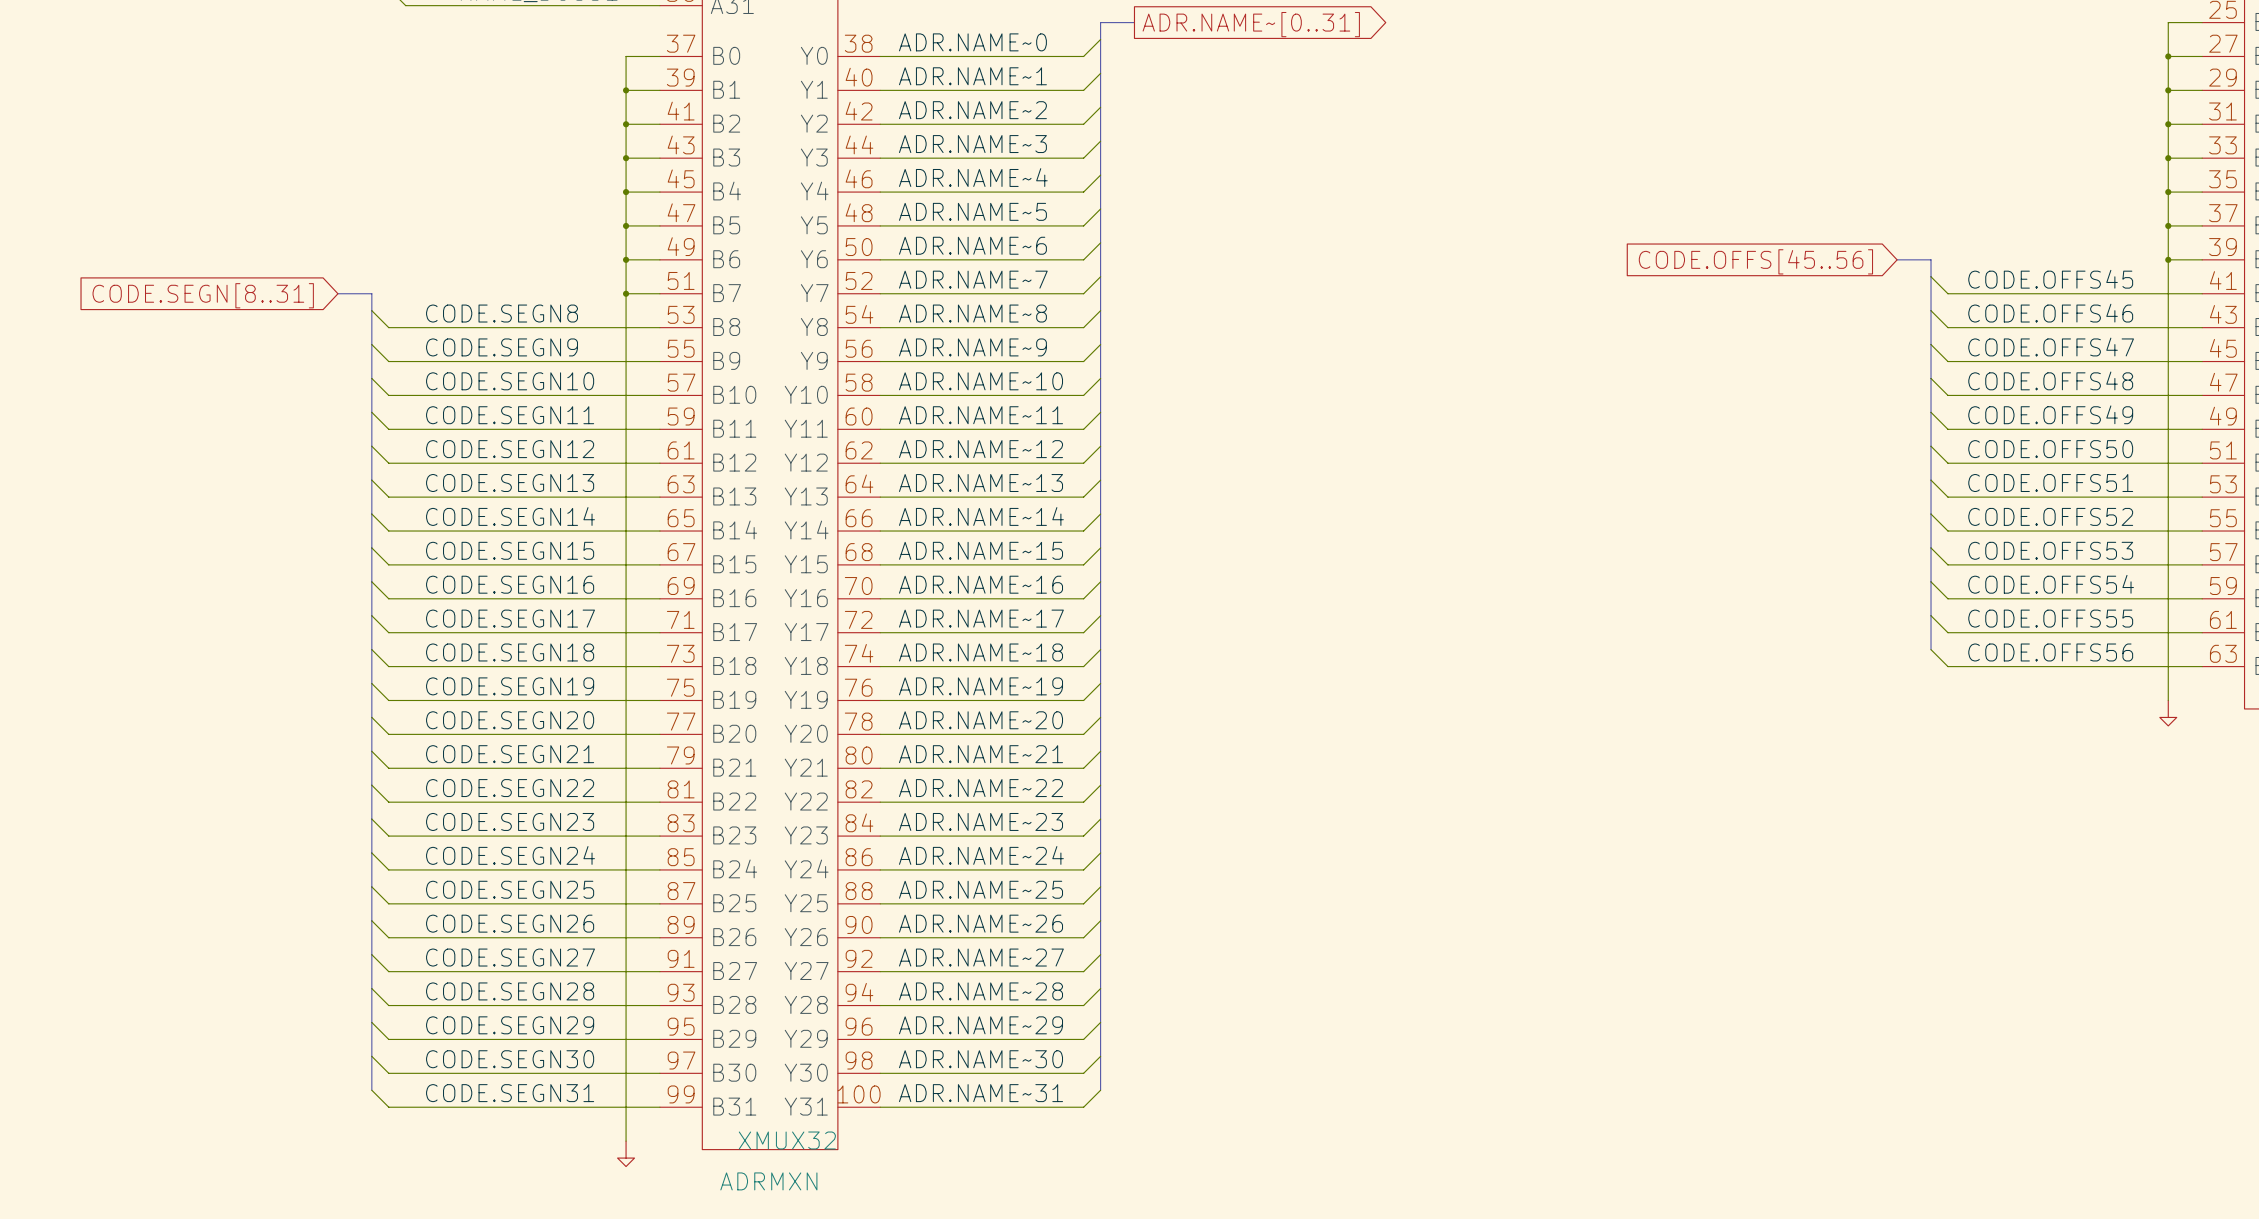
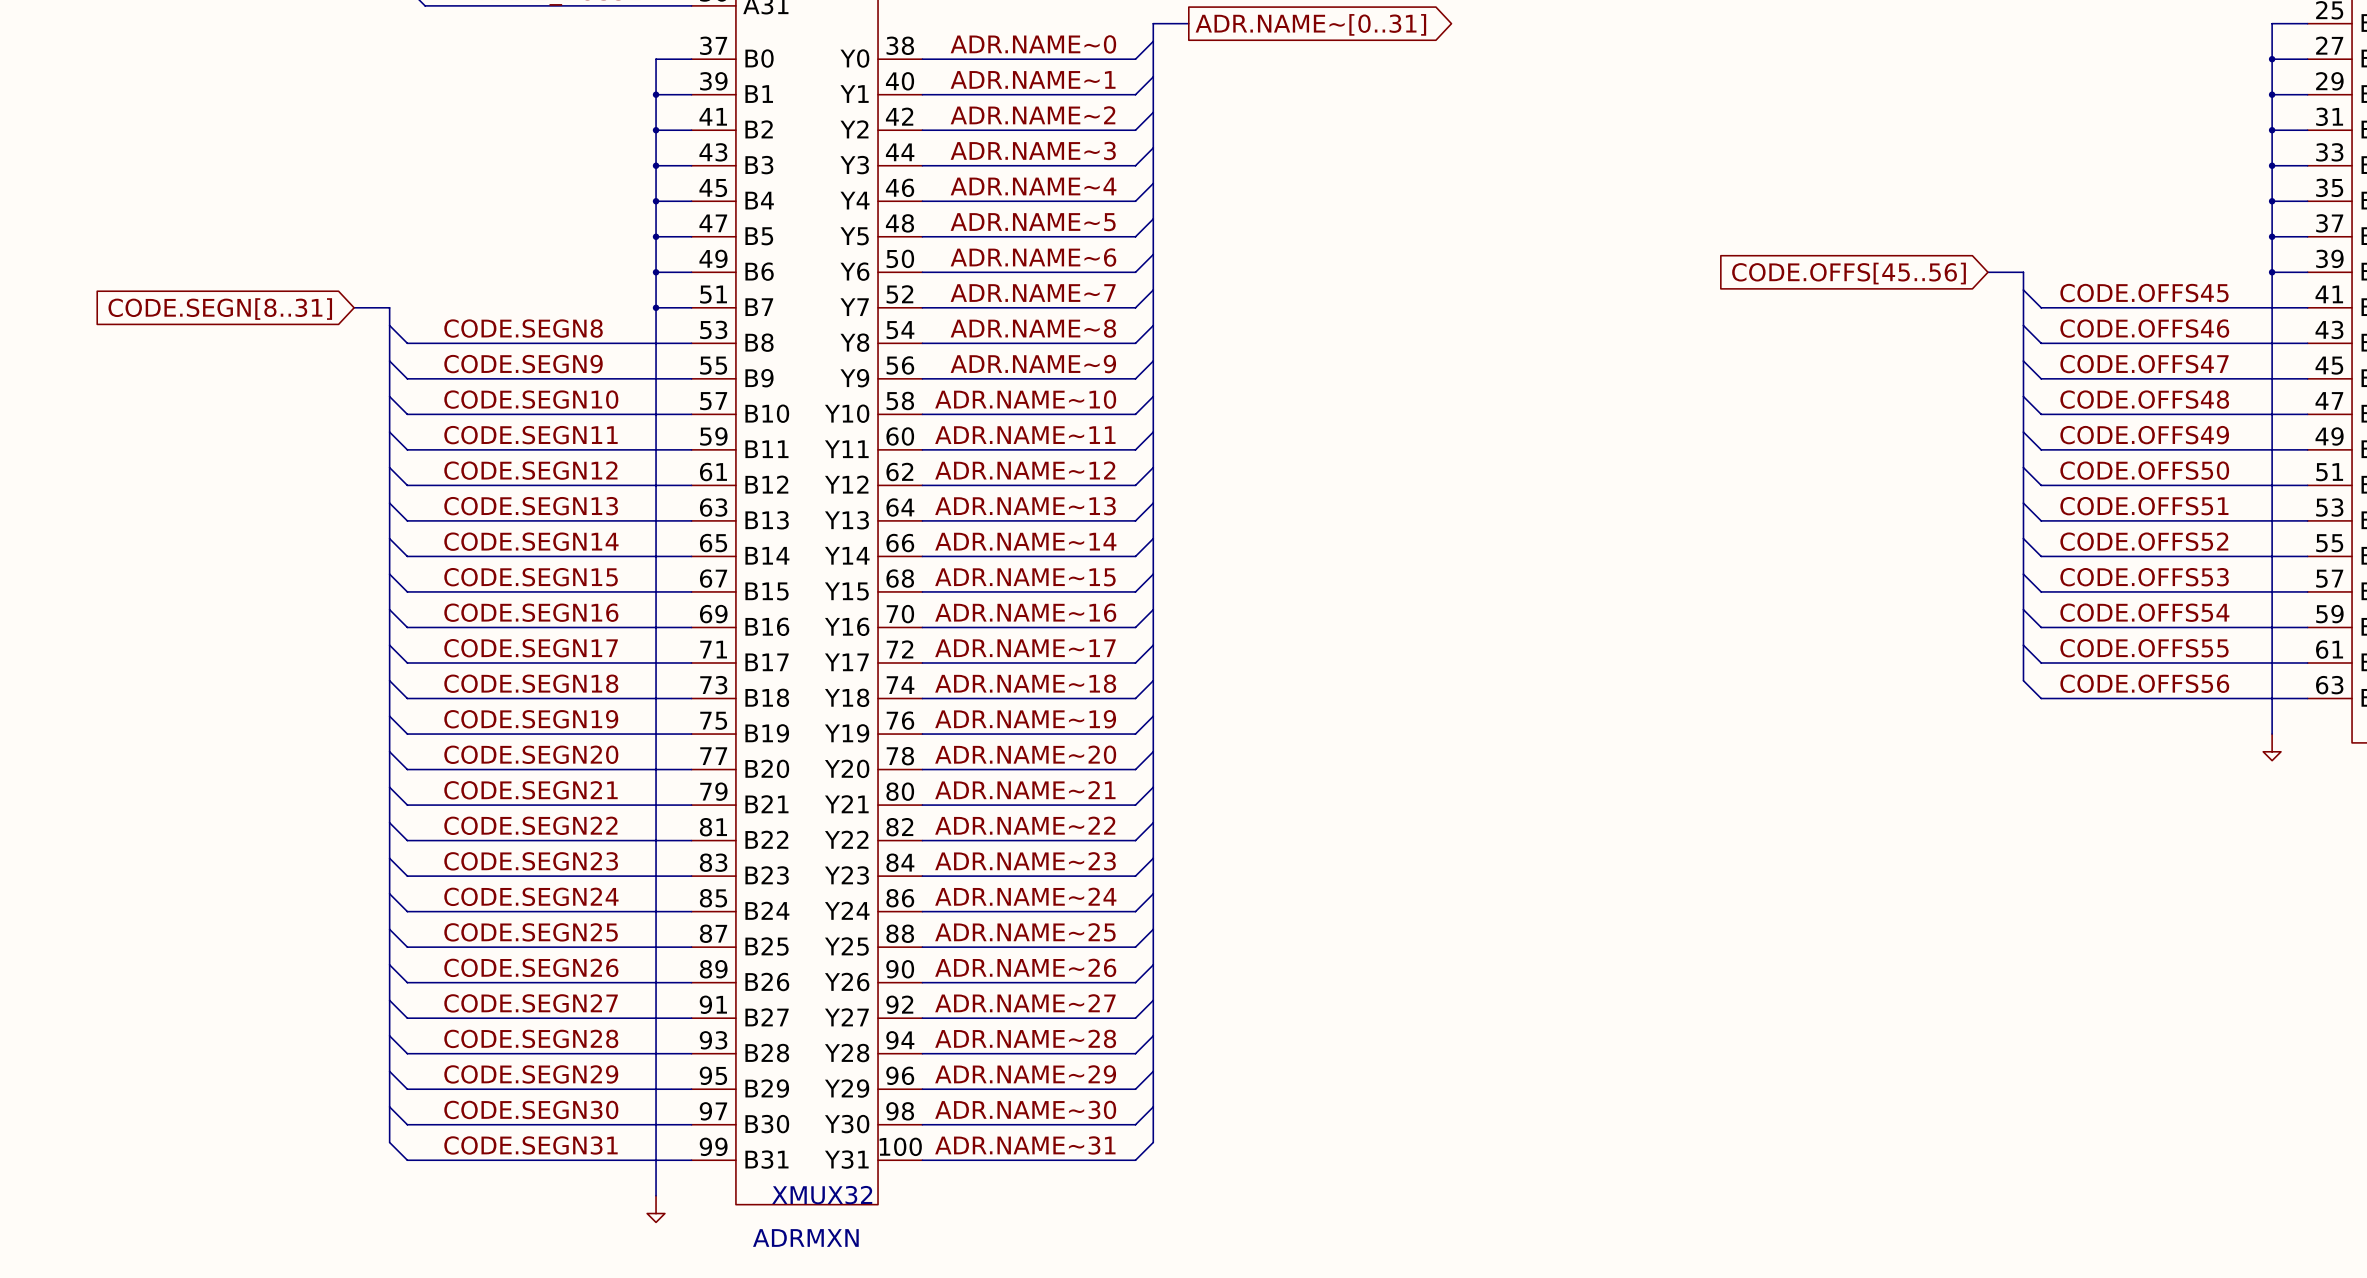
label: ADR.NAME~0 (972, 42) -> none
label: none -> ADR.NAME~0 (1033, 44)
label: ADR.NAME~1 (972, 76) -> none
label: none -> ADR.NAME~1 (1033, 79)
label: ADR.NAME~2 (972, 110) -> none
label: none -> ADR.NAME~2 (1033, 115)
label: ADR.NAME~3 (972, 144) -> none
label: none -> ADR.NAME~3 (1033, 150)
label: ADR.NAME~4 (973, 177) -> none
label: none -> ADR.NAME~4 (1033, 186)
label: ADR.NAME~5 (972, 211) -> none
label: none -> ADR.NAME~5 (1033, 222)
label: ADR.NAME~6 (972, 245) -> none
label: none -> ADR.NAME~6 (1033, 257)
label: ADR.NAME~7 (973, 279) -> none
label: none -> ADR.NAME~7 (1033, 293)
label: ADR.NAME~8 (972, 313) -> none
label: none -> ADR.NAME~8 (1033, 328)
label: ADR.NAME~9 (972, 347) -> none
label: none -> ADR.NAME~9 (1033, 364)
label: ADR.NAME~10 (981, 381) -> none
label: none -> ADR.NAME~10 (1025, 399)
label: ADR.NAME~11 (981, 415) -> none
label: none -> ADR.NAME~11 (1025, 435)
label: ADR.NAME~12 (981, 449) -> none
label: none -> ADR.NAME~12 (1025, 470)
label: ADR.NAME~13 (981, 483) -> none
label: none -> ADR.NAME~13 (1025, 506)
label: ADR.NAME~14 (981, 516) -> none
label: none -> ADR.NAME~14 (1025, 541)
label: ADR.NAME~15 (981, 550) -> none
label: none -> ADR.NAME~15 (1025, 577)
label: ADR.NAME~16 (981, 584) -> none
label: none -> ADR.NAME~16 (1025, 612)
label: ADR.NAME~17 (981, 618) -> none
label: none -> ADR.NAME~17 (1025, 648)
label: ADR.NAME~18 (981, 652) -> none
label: none -> ADR.NAME~18 (1025, 683)
label: ADR.NAME~19 (981, 686) -> none
label: none -> ADR.NAME~19 (1025, 719)
label: ADR.NAME~20 (981, 720) -> none
label: none -> ADR.NAME~20 (1025, 754)
label: ADR.NAME~21 (981, 754) -> none
label: none -> ADR.NAME~21 (1025, 790)
label: ADR.NAME~22 (981, 788) -> none
label: none -> ADR.NAME~22 (1025, 825)
label: ADR.NAME~23 (981, 821) -> none
label: none -> ADR.NAME~23 (1025, 861)
label: ADR.NAME~24 (981, 855) -> none
label: none -> ADR.NAME~24 (1025, 896)
label: ADR.NAME~25 (981, 889) -> none
label: none -> ADR.NAME~25 (1025, 932)
label: ADR.NAME~26 (981, 923) -> none
label: none -> ADR.NAME~26 (1025, 967)
label: ADR.NAME~27 (981, 957) -> none
label: none -> ADR.NAME~27 (1025, 1003)
label: ADR.NAME~28 (981, 991) -> none
label: none -> ADR.NAME~28 (1025, 1038)
label: ADR.NAME~29 (981, 1025) -> none
label: none -> ADR.NAME~29 (1025, 1074)
label: ADR.NAME~30 (981, 1059) -> none
label: none -> ADR.NAME~30 (1025, 1109)
label: ADR.NAME~31 (981, 1093) -> none
label: none -> ADR.NAME~31 (1025, 1145)

